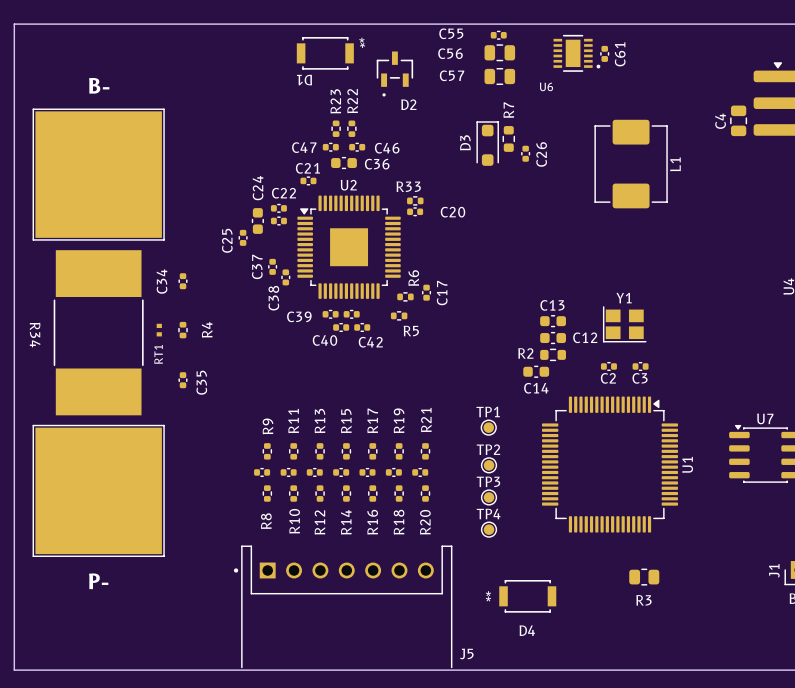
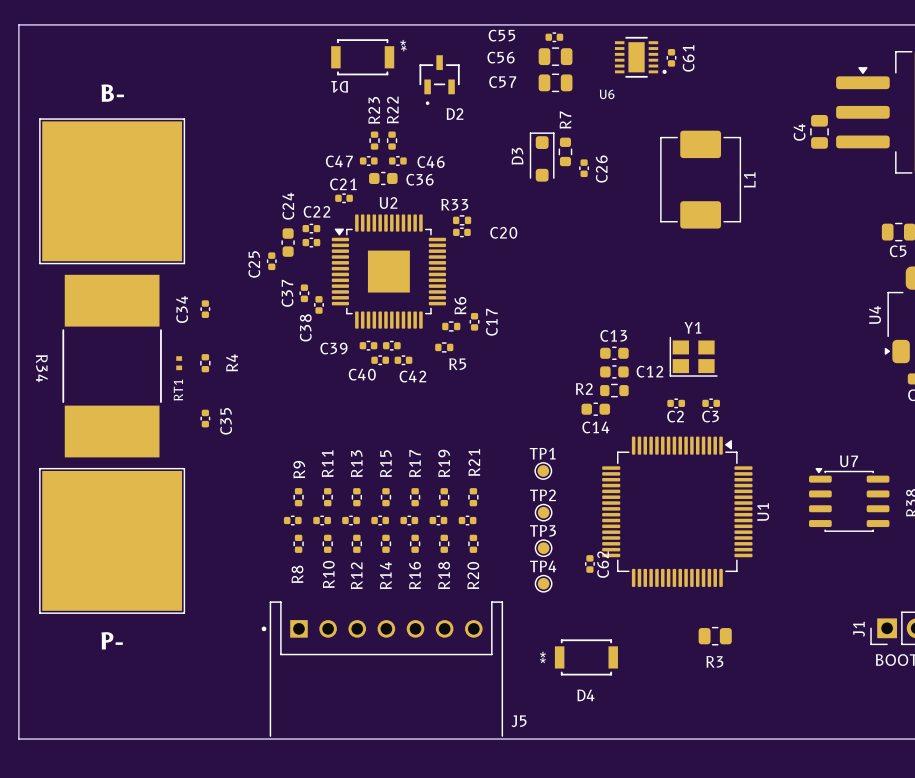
C62: none -> (589, 563)

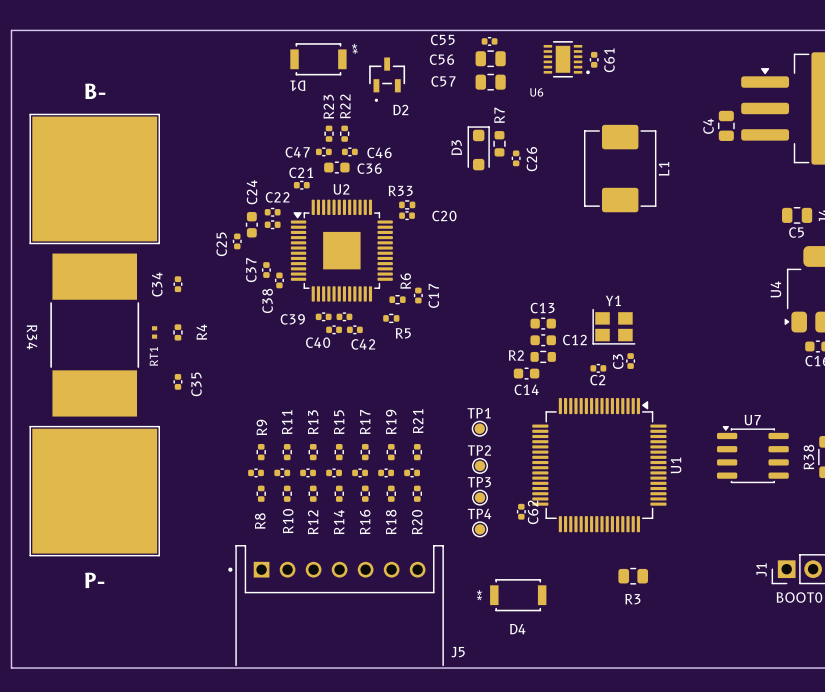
C3 rotation: 0° (711, 403) -> 90° clockwise (630, 361)

